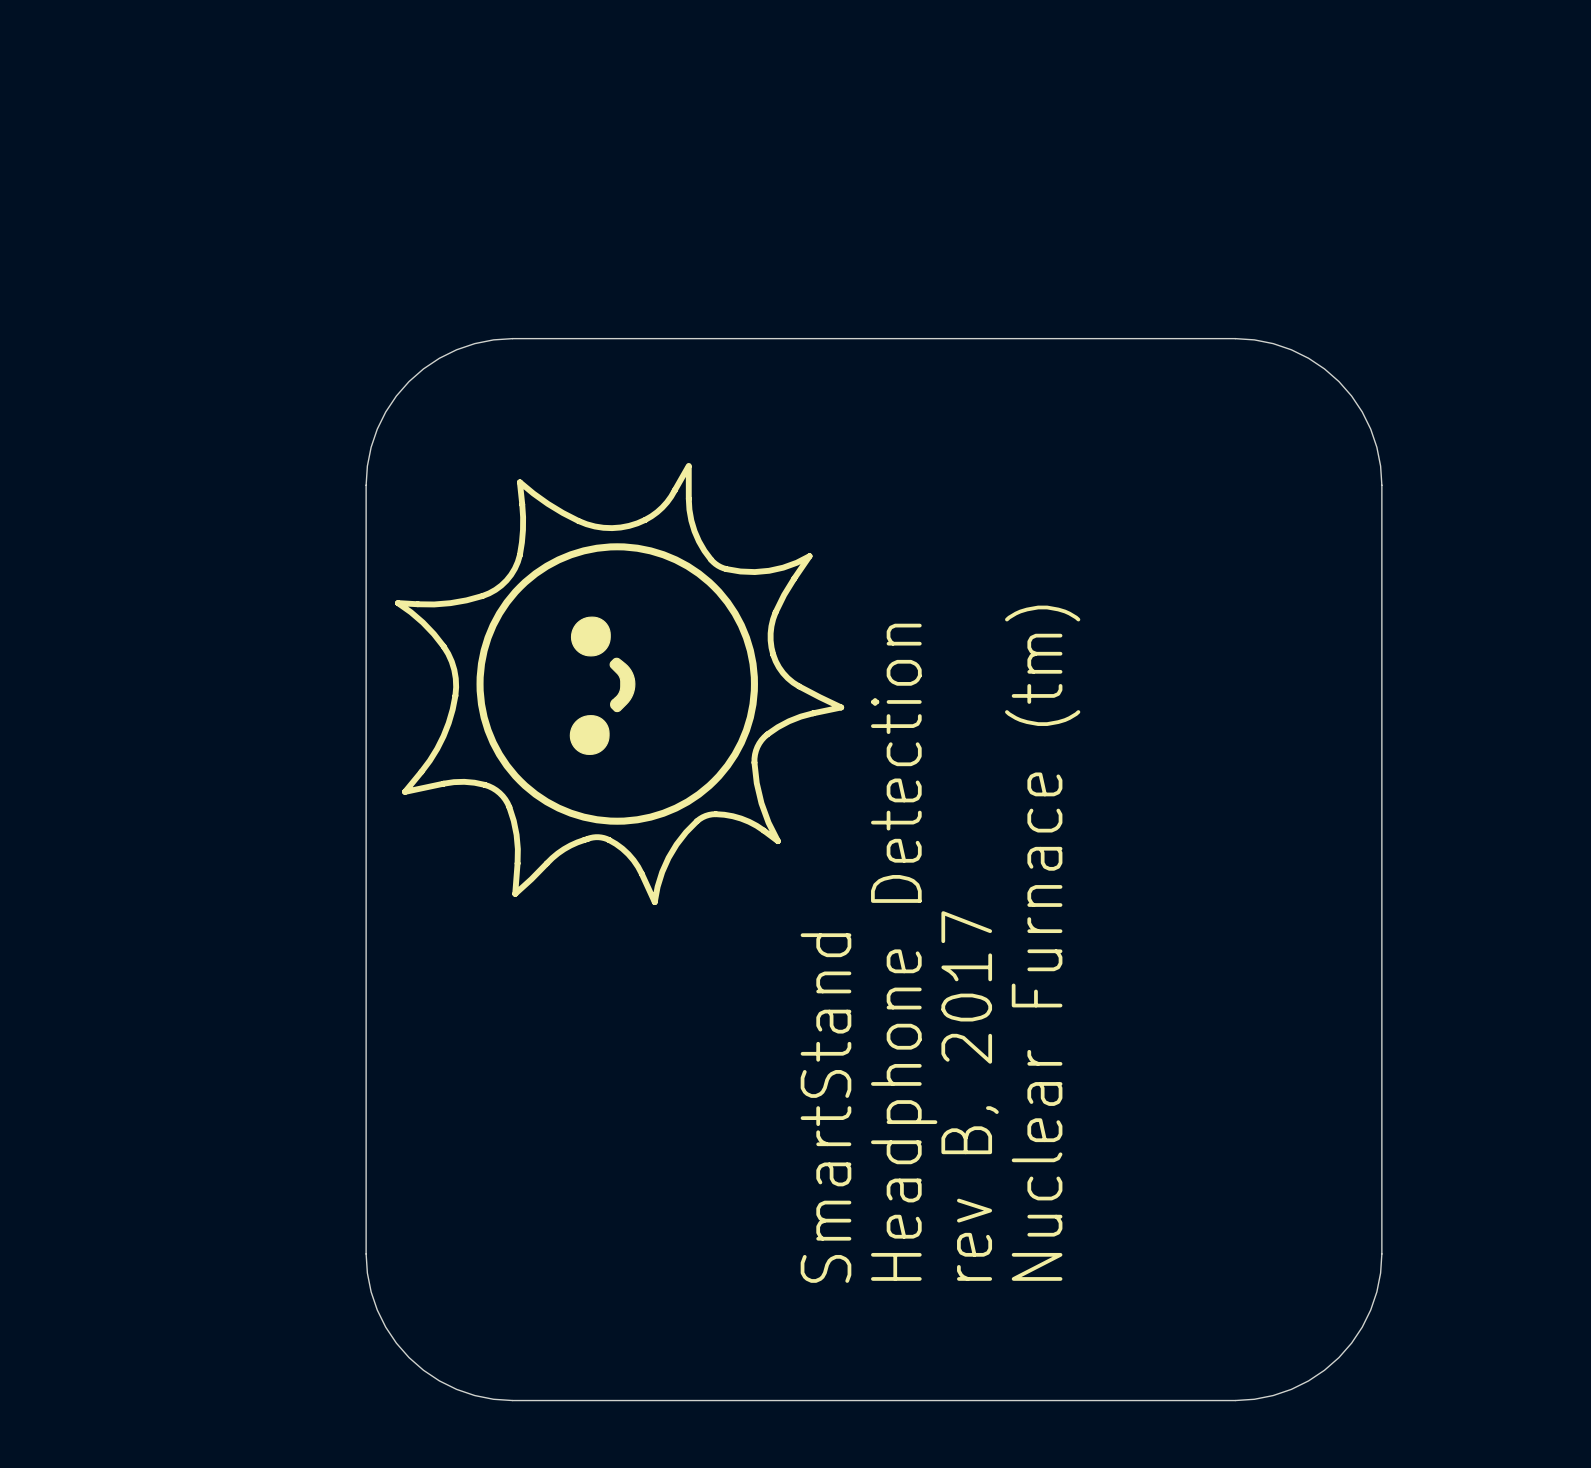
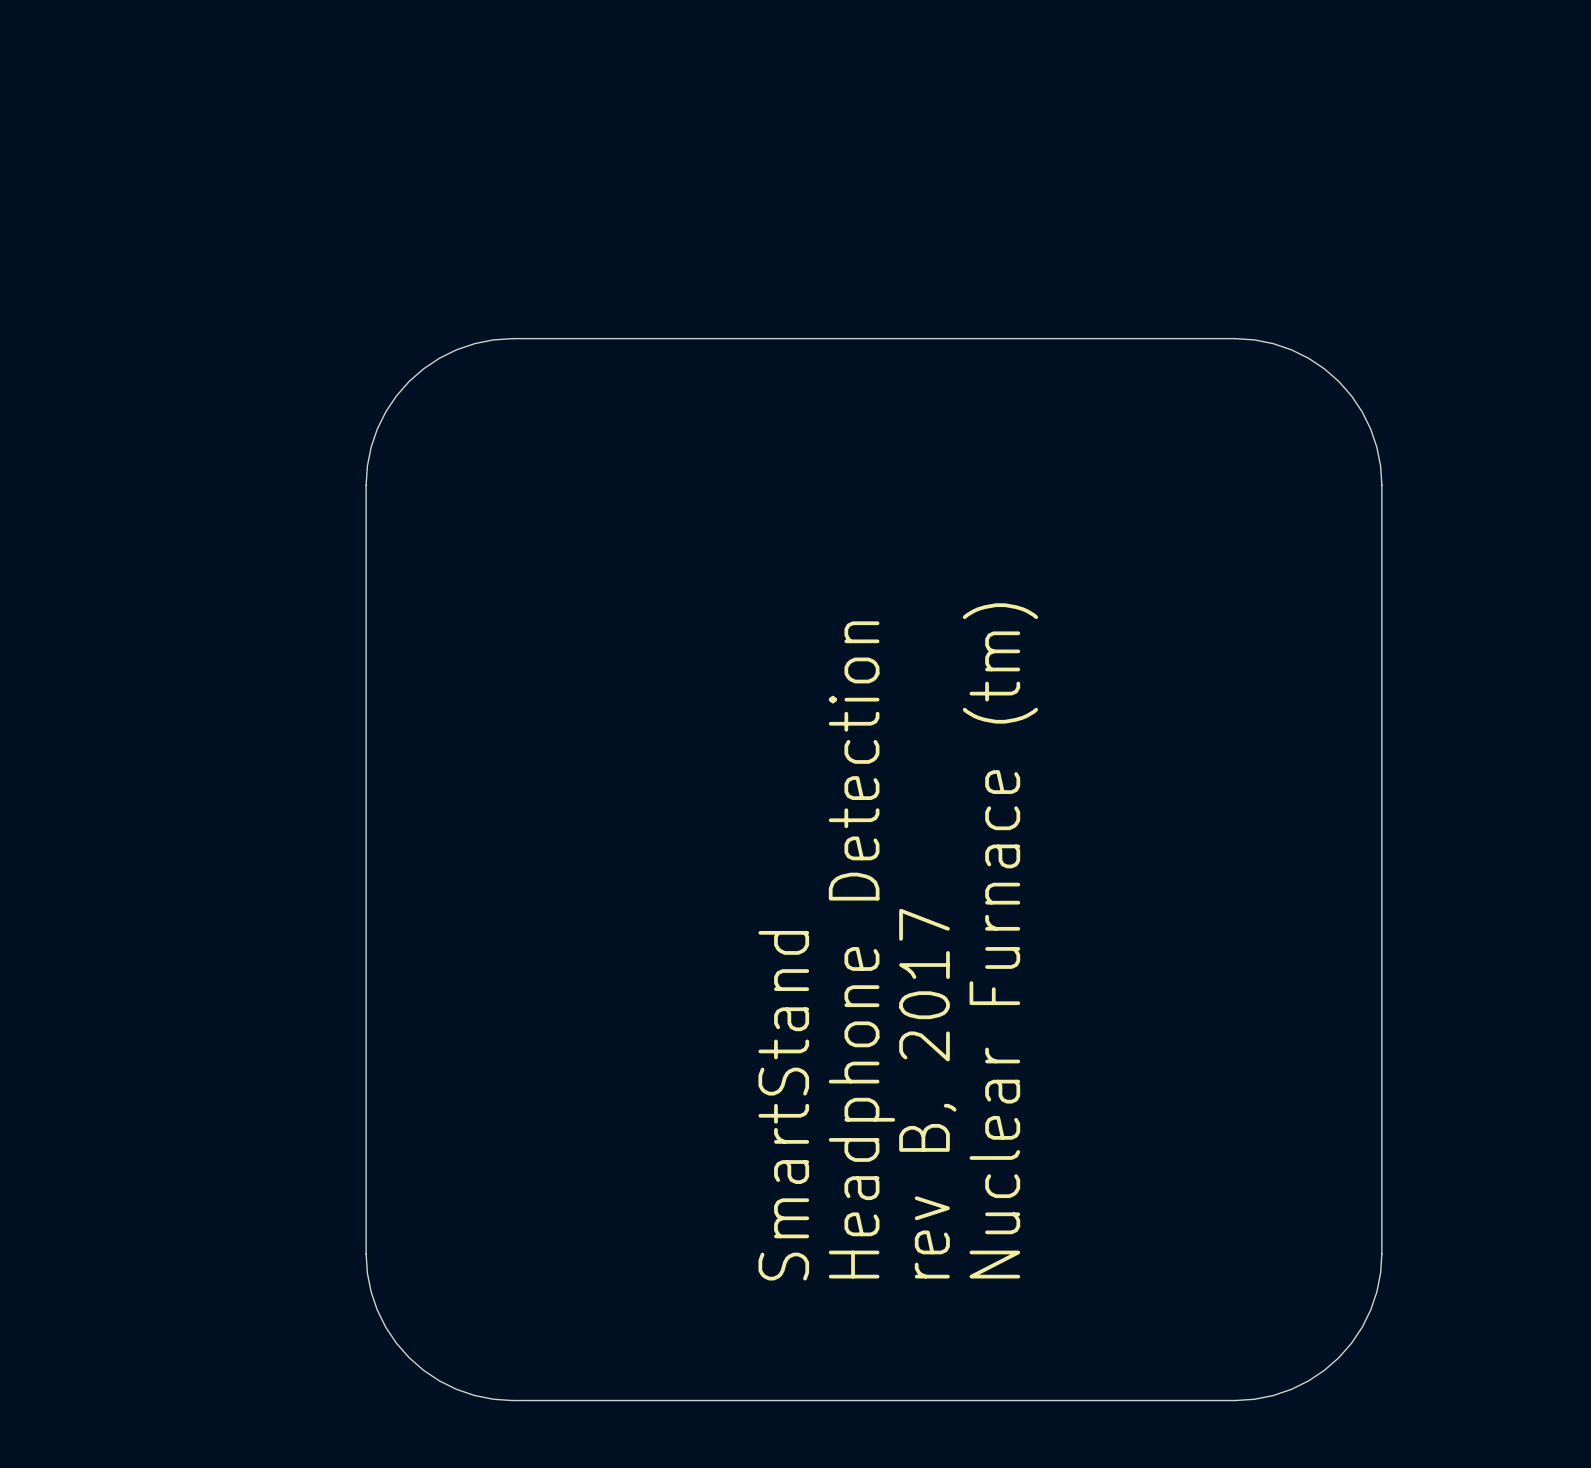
line: (688, 465) (671, 496) (662, 507) (645, 519) (620, 527) (603, 527) (578, 521) (547, 503) (519, 482) (523, 517) (521, 542) (517, 561) (506, 580) (489, 593) (466, 600) (434, 604) (397, 603) (422, 622) (443, 646) (451, 661) (456, 687) (452, 709) (443, 736) (429, 760) (404, 791) (443, 783) (464, 781) (484, 784) (499, 793) (509, 807) (516, 834) (517, 863) (515, 893) (557, 853) (570, 845) (593, 837) (609, 839) (628, 854) (638, 866) (654, 902) (657, 886) (668, 857) (686, 832) (702, 817) (715, 814) (741, 818) (756, 825) (777, 841) (768, 822) (756, 783) (754, 758) (757, 746) (767, 734) (789, 721) (813, 713) (841, 707) (799, 686) (787, 678) (778, 667) (771, 647) (770, 633) (775, 612) (784, 595) (809, 556) (783, 567) (754, 572) (726, 569) (715, 563) (698, 541) (691, 520) (688, 498) (688, 467) -> none
drawing: [476, 543, 758, 825] -> none
text position: Nuclear Furnace (tm) (1042, 943) -> Nuclear Furnace (tm) (1000, 940)
text position: Headphone Detection (904, 952) -> Headphone Detection (861, 949)
text position: rev B, 2017 (970, 1096) -> rev B, 2017 (927, 1093)
text position: SmartStand (825, 1108) -> SmartStand (783, 1105)

